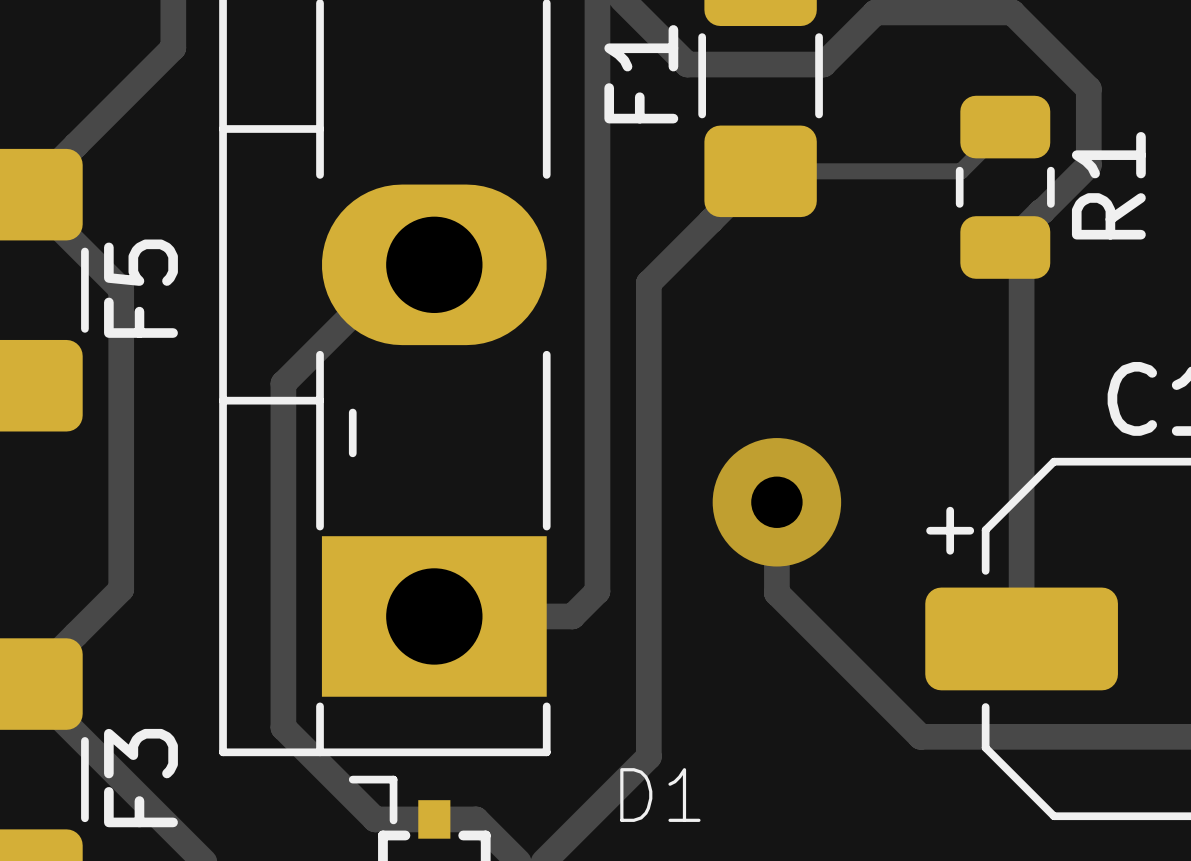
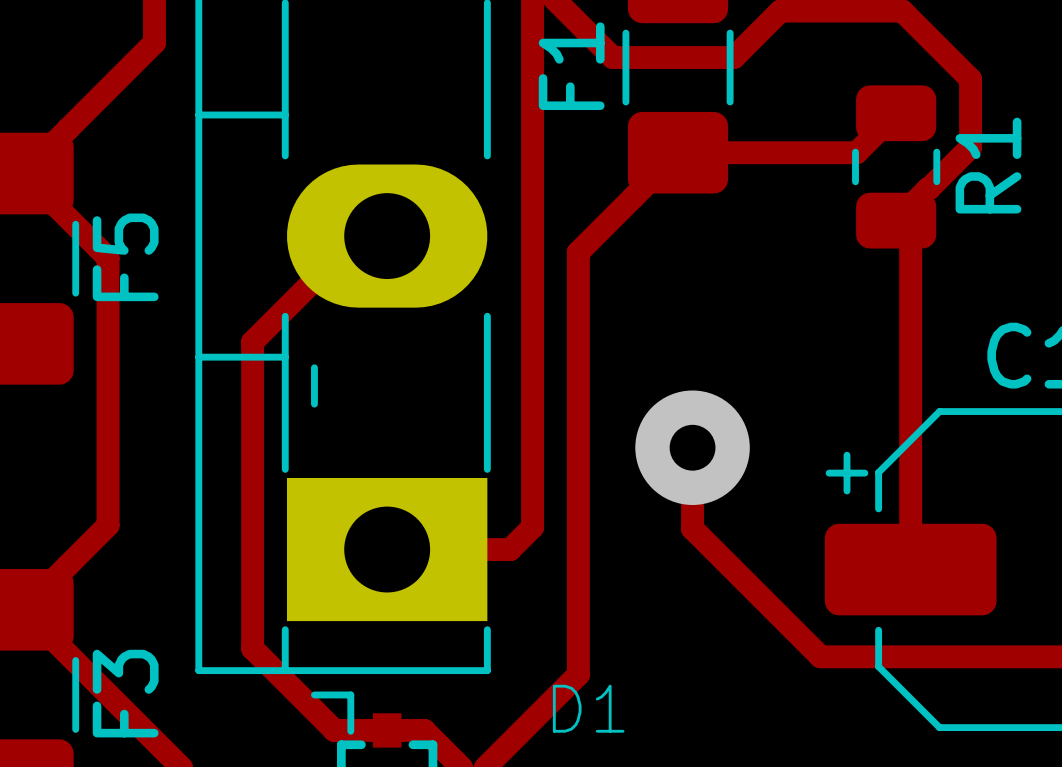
track width: thin (1005, 127) (961, 171) (760, 171) -> thick (896, 113) (856, 152) (678, 152)

